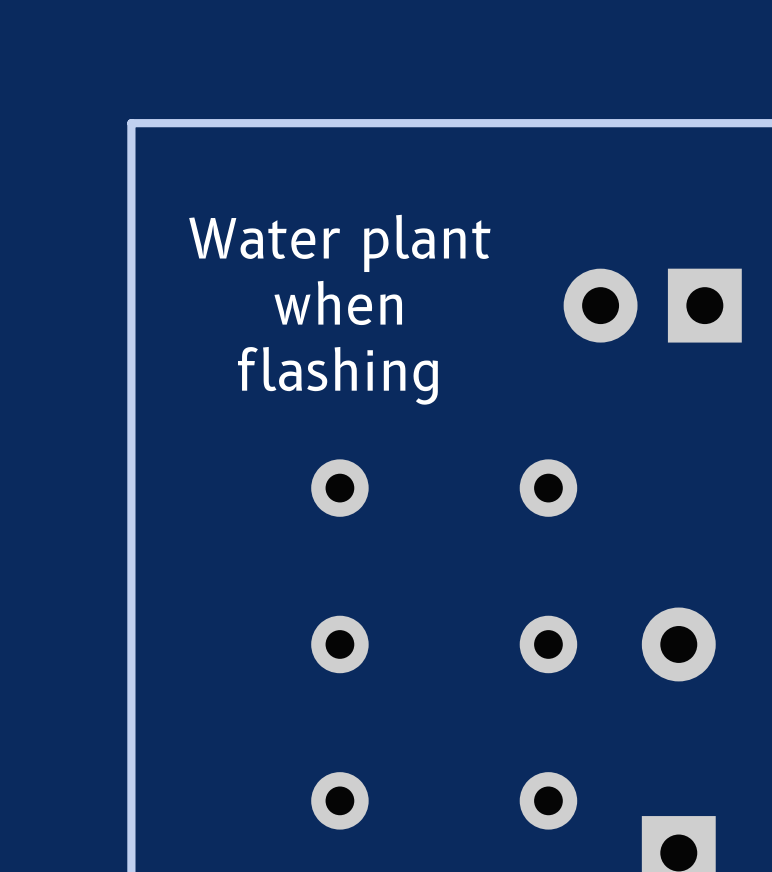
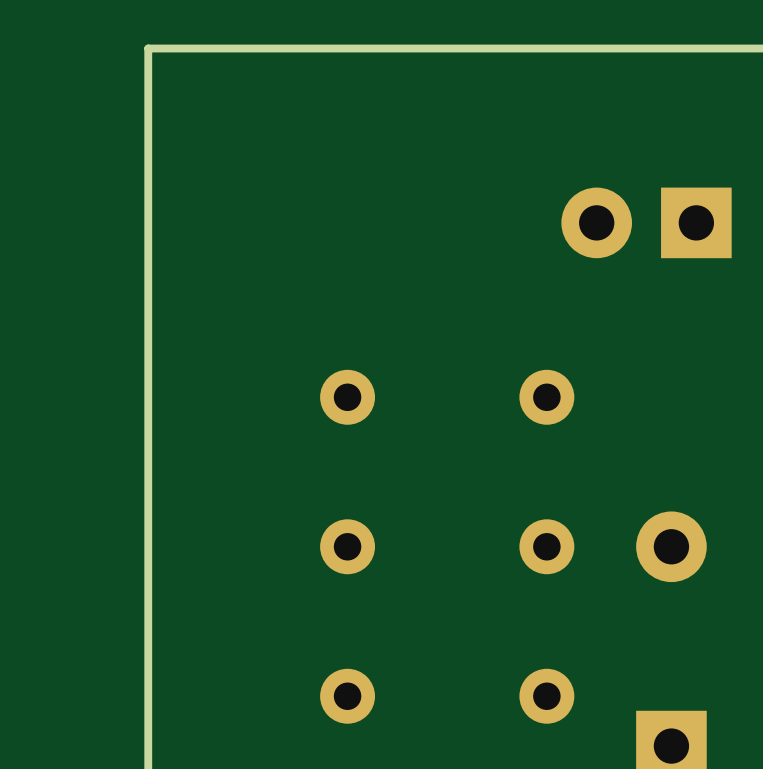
text: Water plant (339, 243) -> none
text: when (338, 302) -> none
text: flashing (337, 375) -> none

